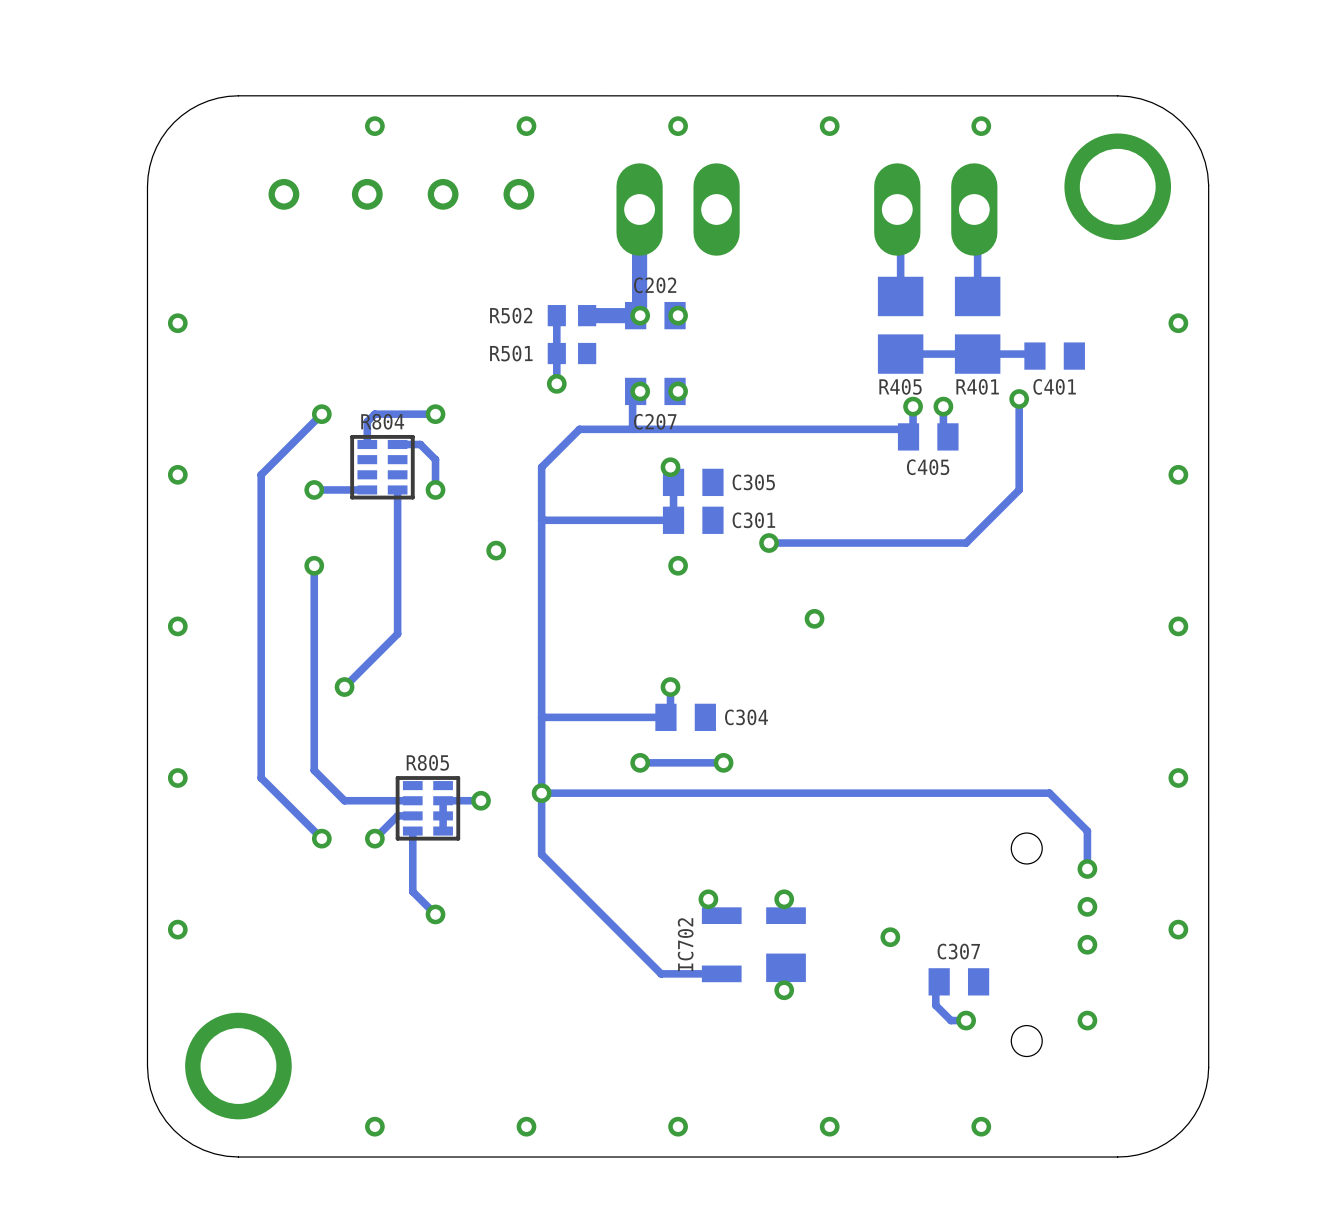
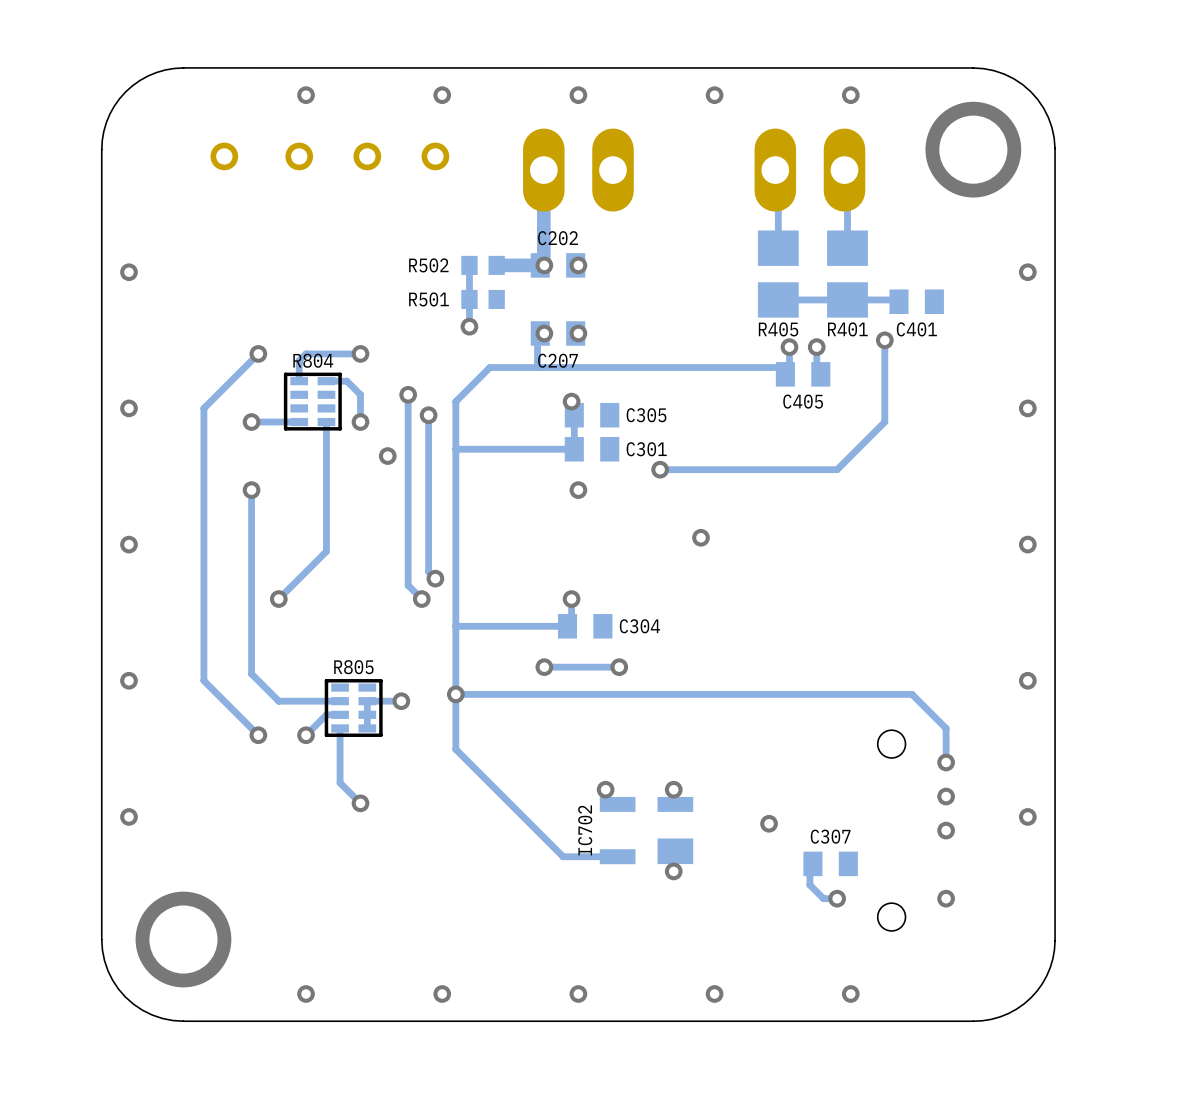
track: none -> (408, 394) (408, 585) (421, 599)
via: none -> (408, 394)
track: none -> (428, 415) (428, 571) (435, 578)
via: none -> (428, 415)
via: none -> (387, 456)
via: (496, 550) -> none
via: none -> (435, 578)
via: none -> (421, 599)

